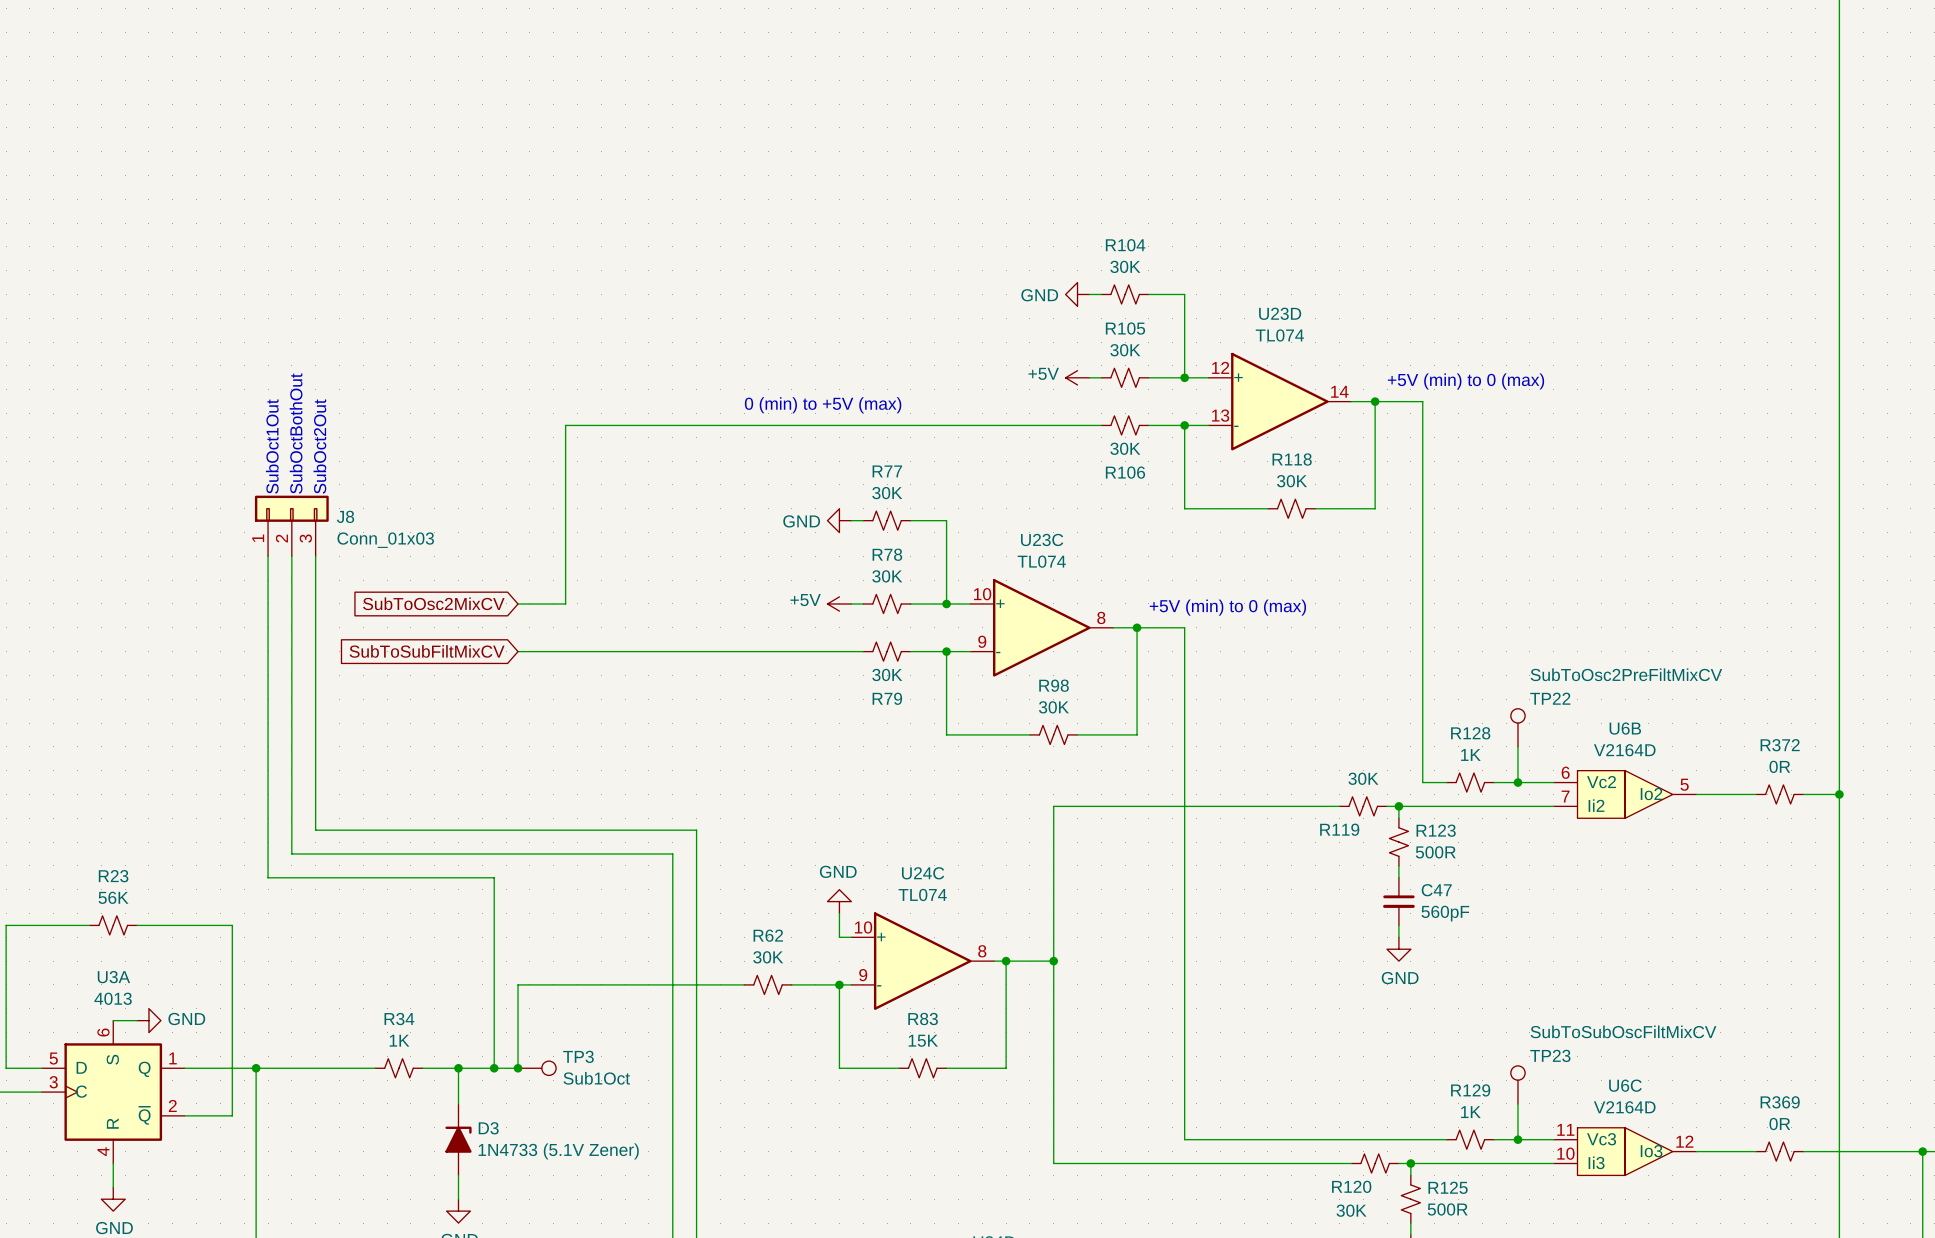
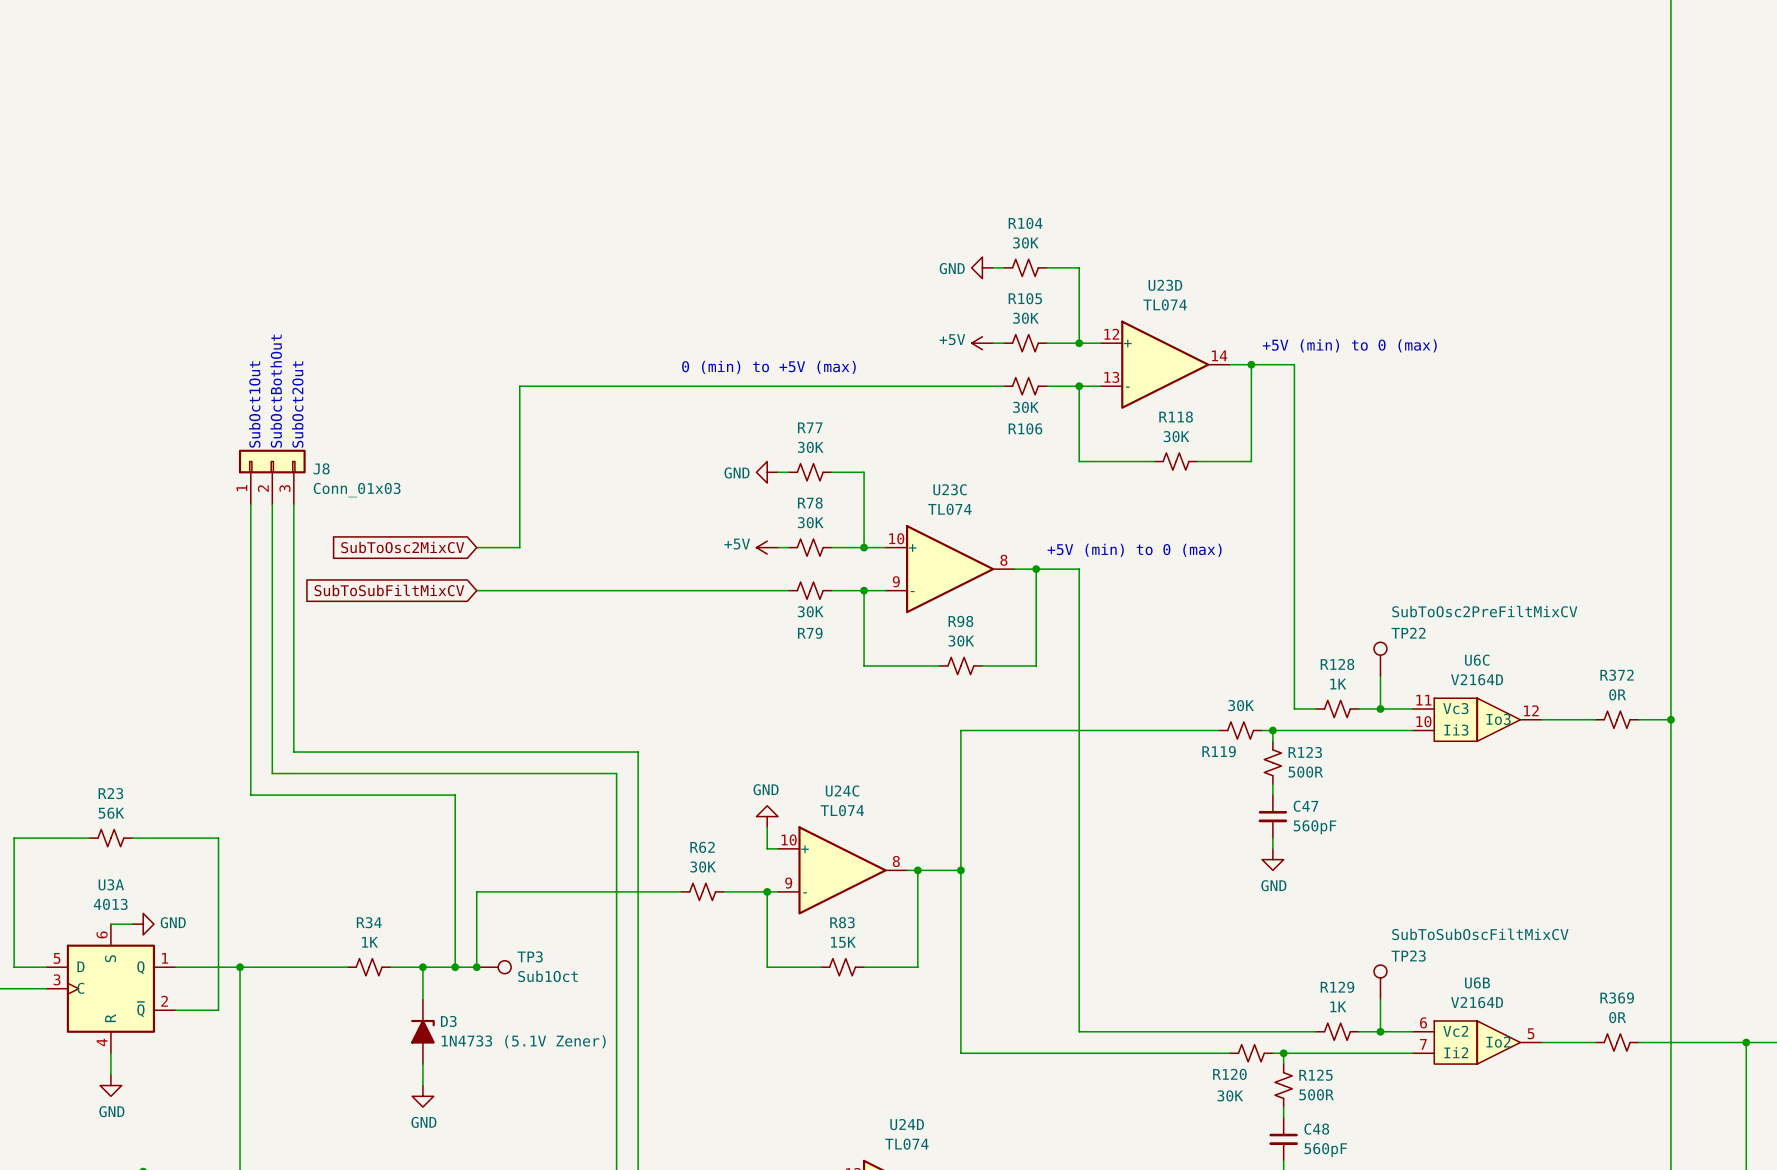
U6B position: (1625, 794) -> (1477, 1042)
U6C position: (1625, 1151) -> (1477, 719)

